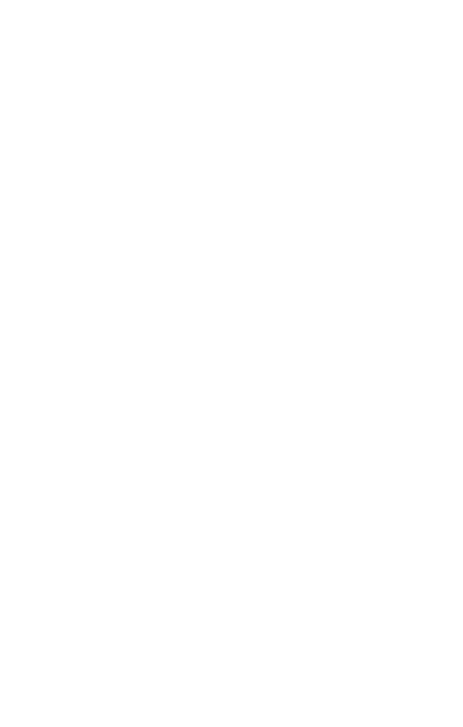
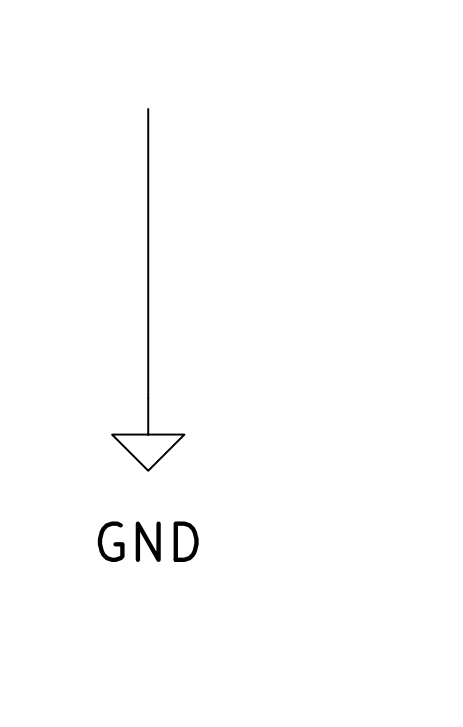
wire: none -> (148, 109) (148, 398)
power symbol: none -> GND (148, 434)

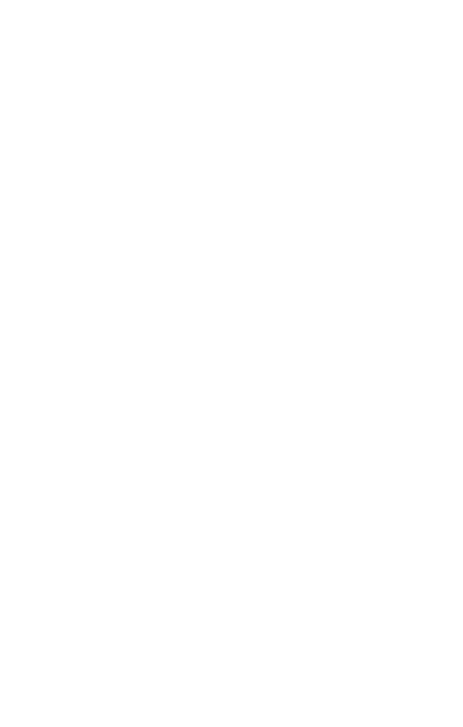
wire: (148, 109) (148, 398) -> none
power symbol: GND (148, 434) -> none

